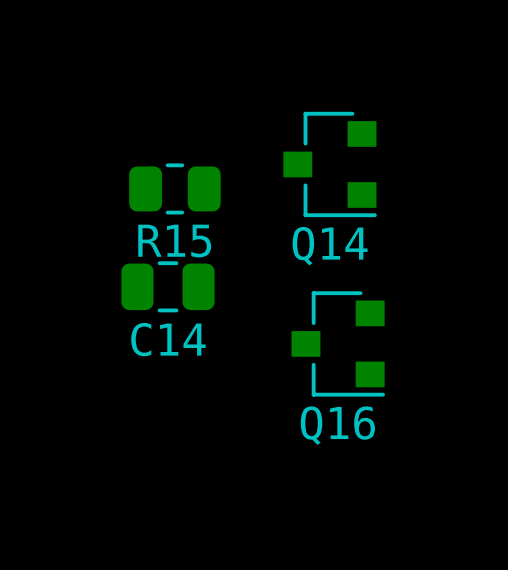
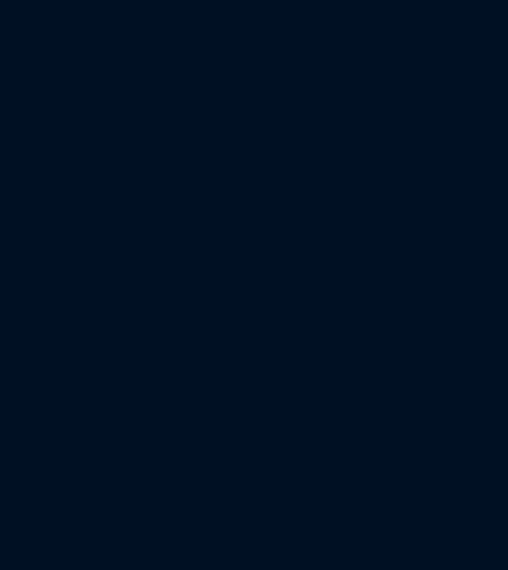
Q14: (330, 164) -> none
R15: (174, 188) -> none
C14: (168, 286) -> none
Q16: (338, 343) -> none

